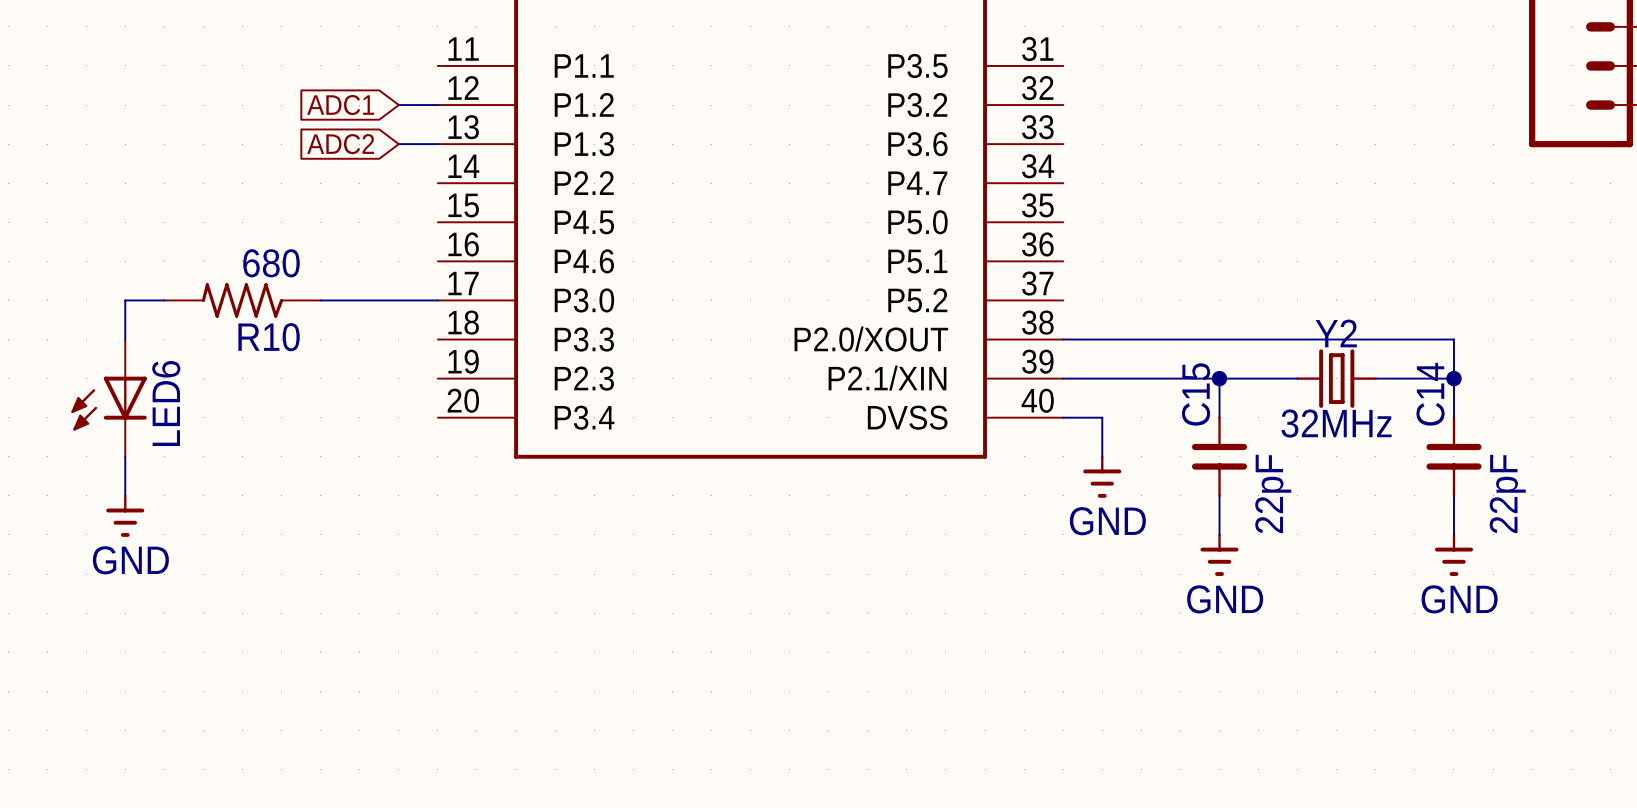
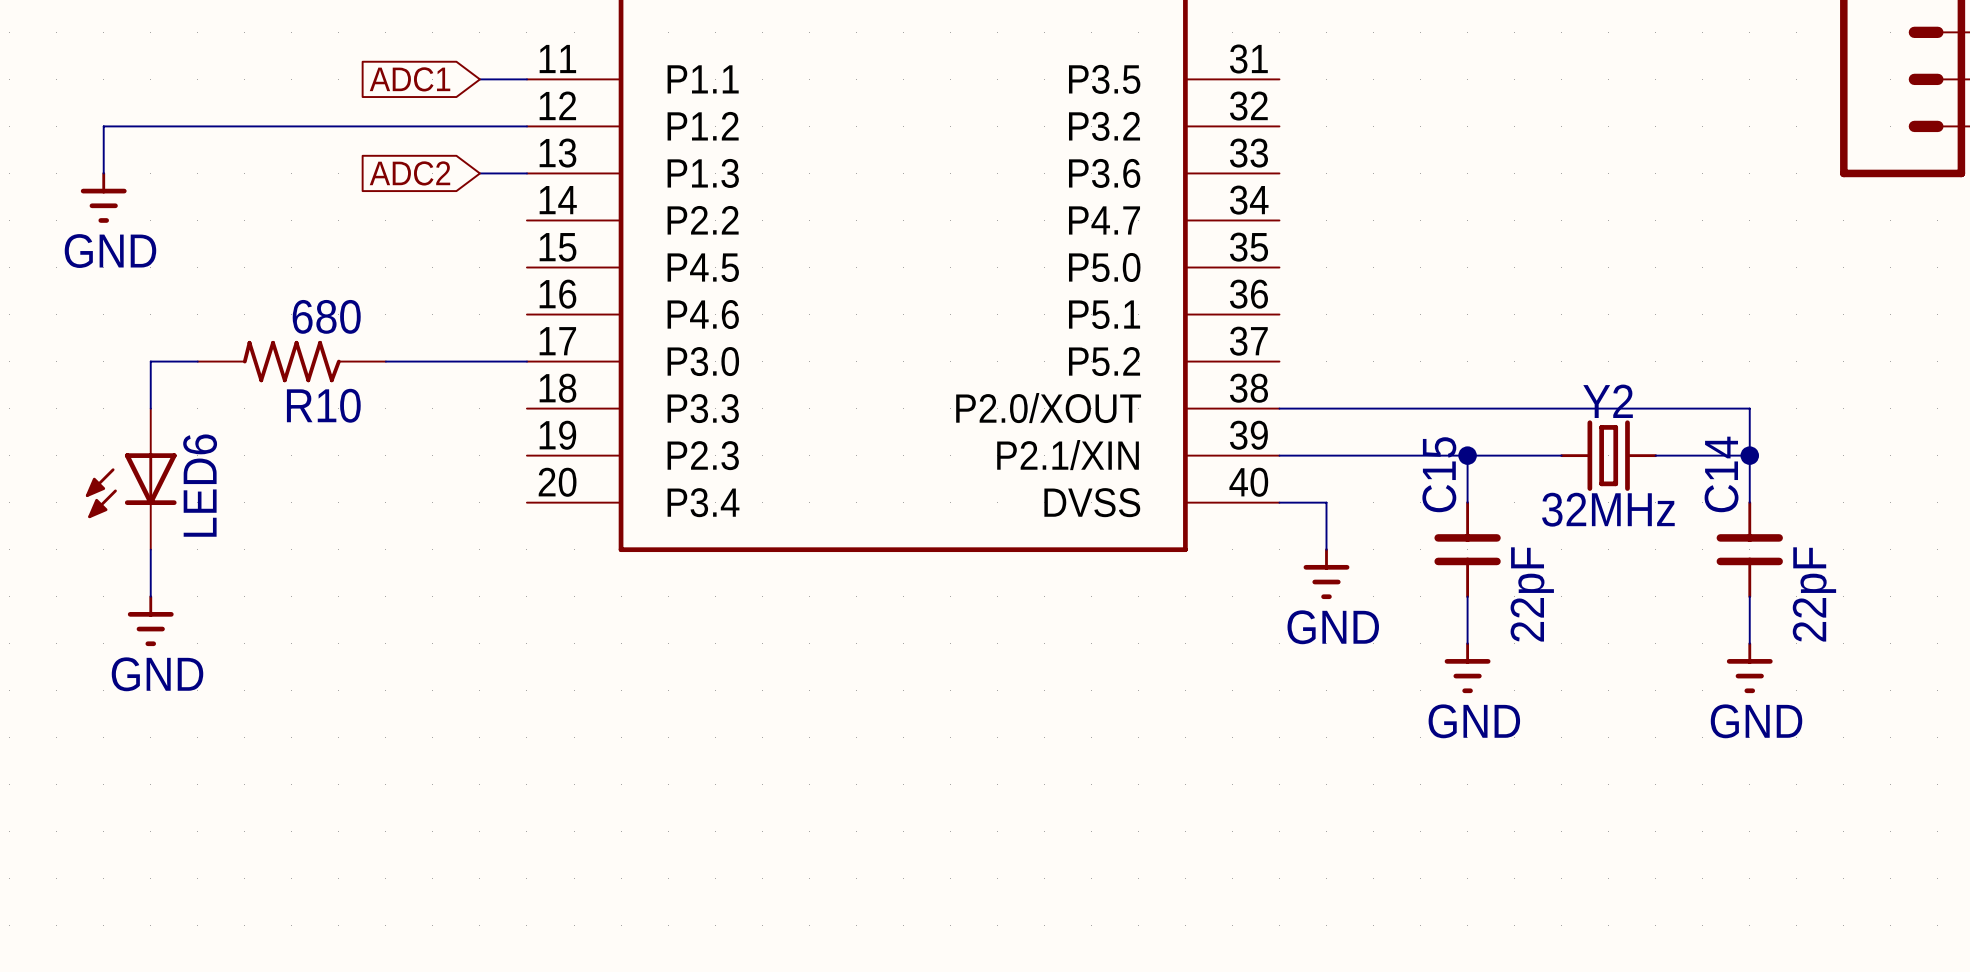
wire: none -> (479, 79) (526, 79)
global label position: ADC1 (340, 105) -> ADC1 (409, 79)
wire: none -> (479, 126) (103, 126) (103, 173)
power symbol: none -> GND (103, 197)

